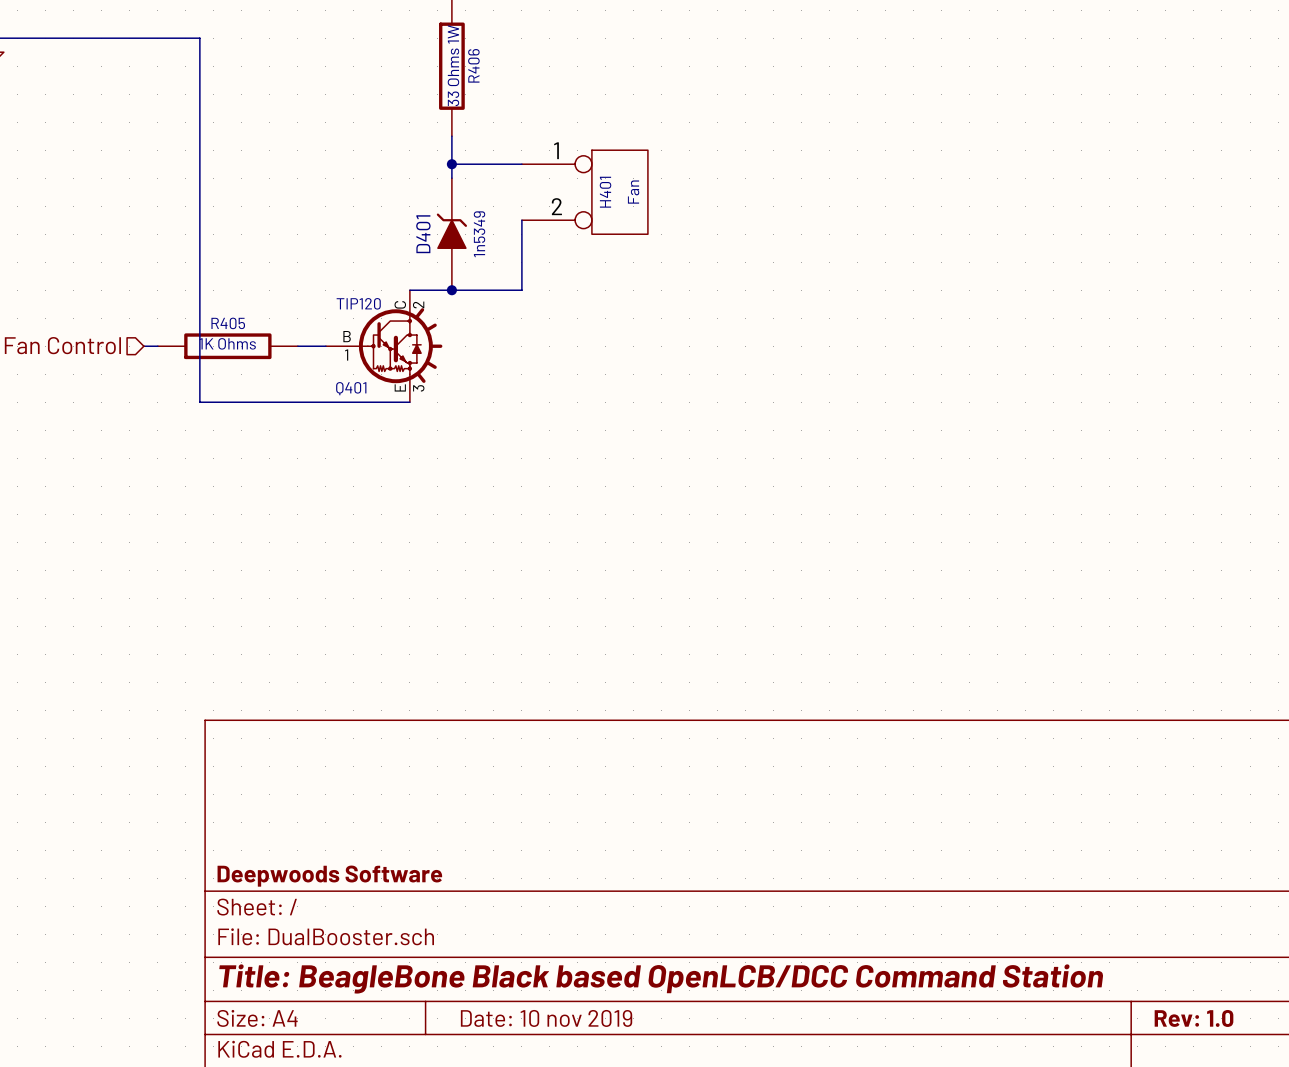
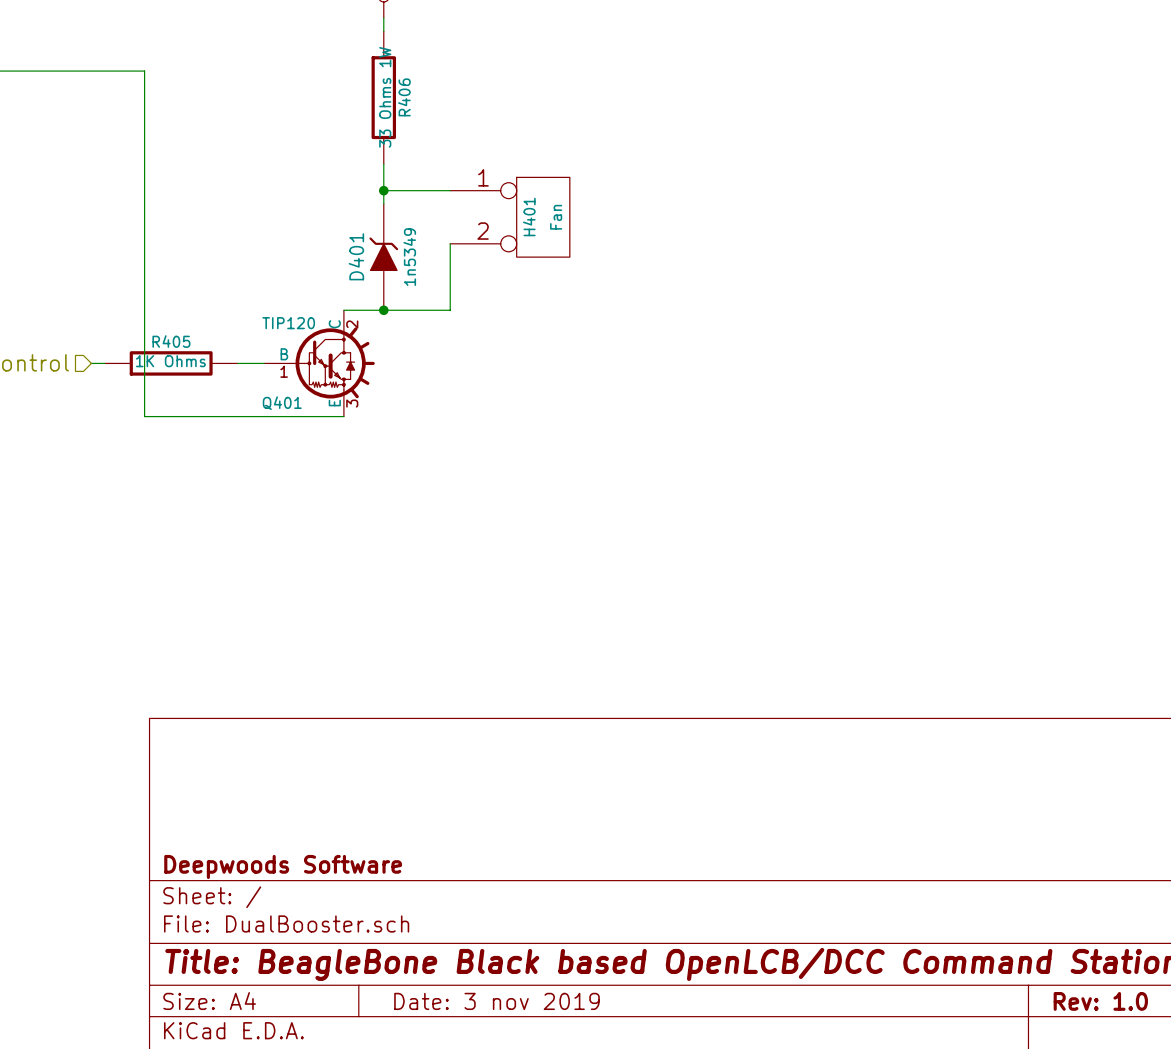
title block: Date: 10 nov 2019 (546, 1018) -> Date: 3 nov 2019 (497, 1001)

